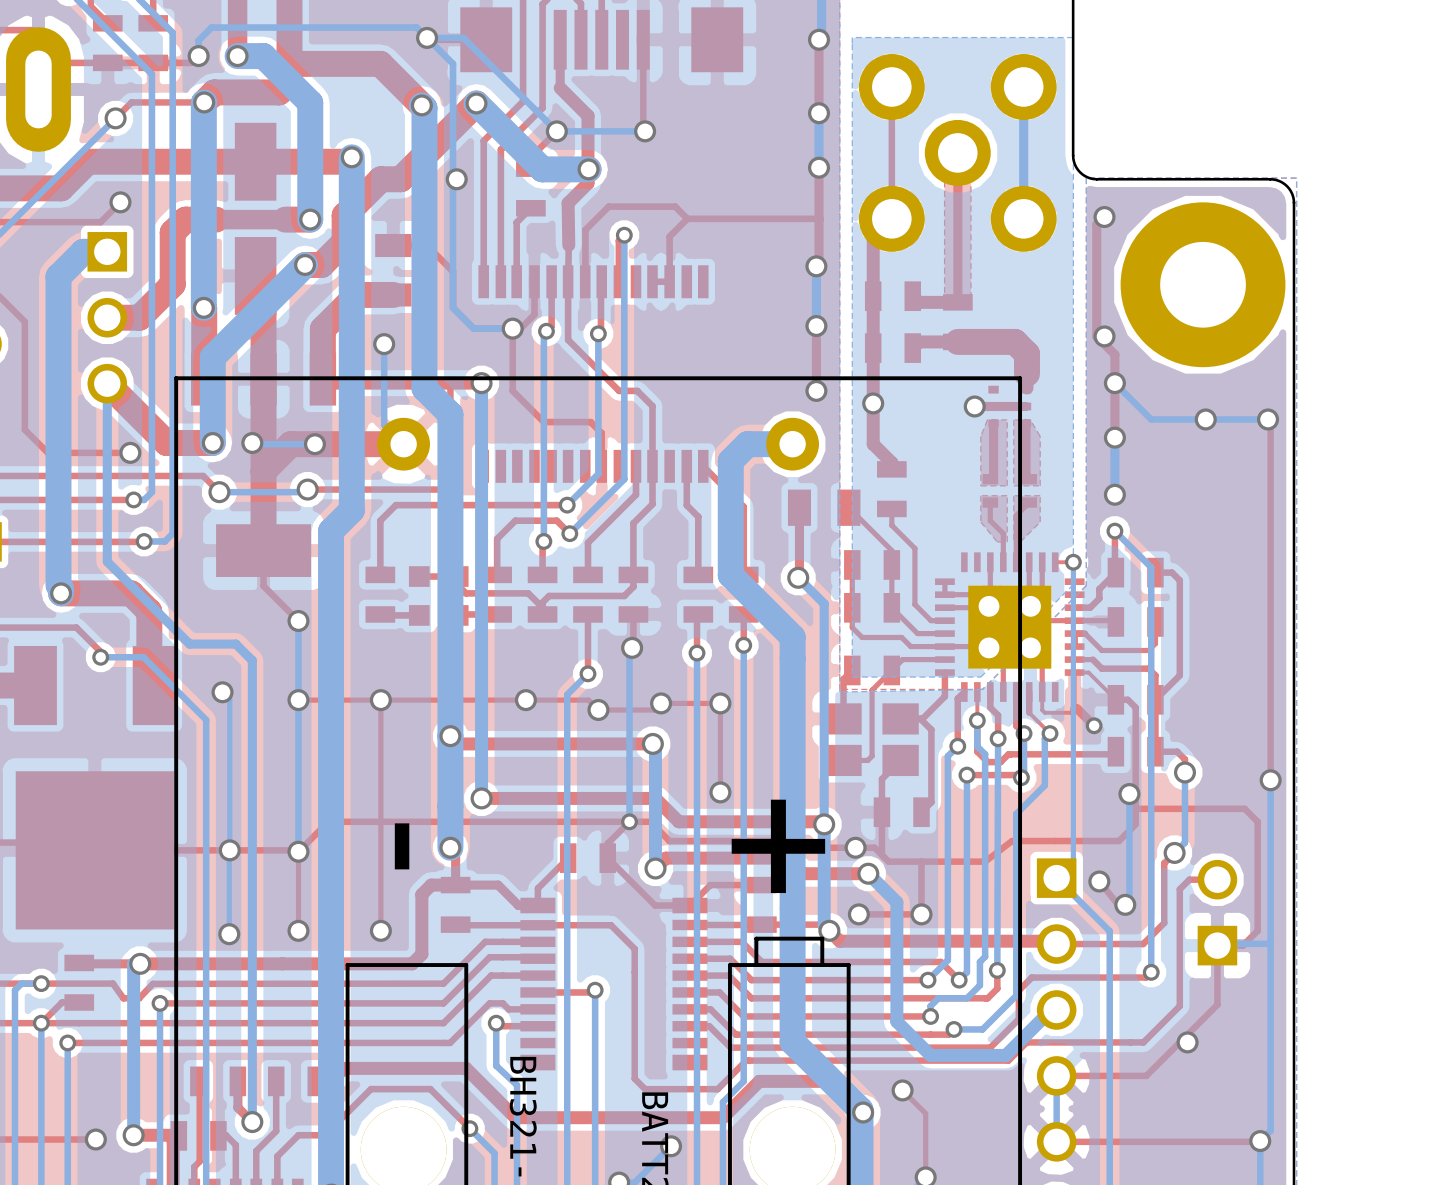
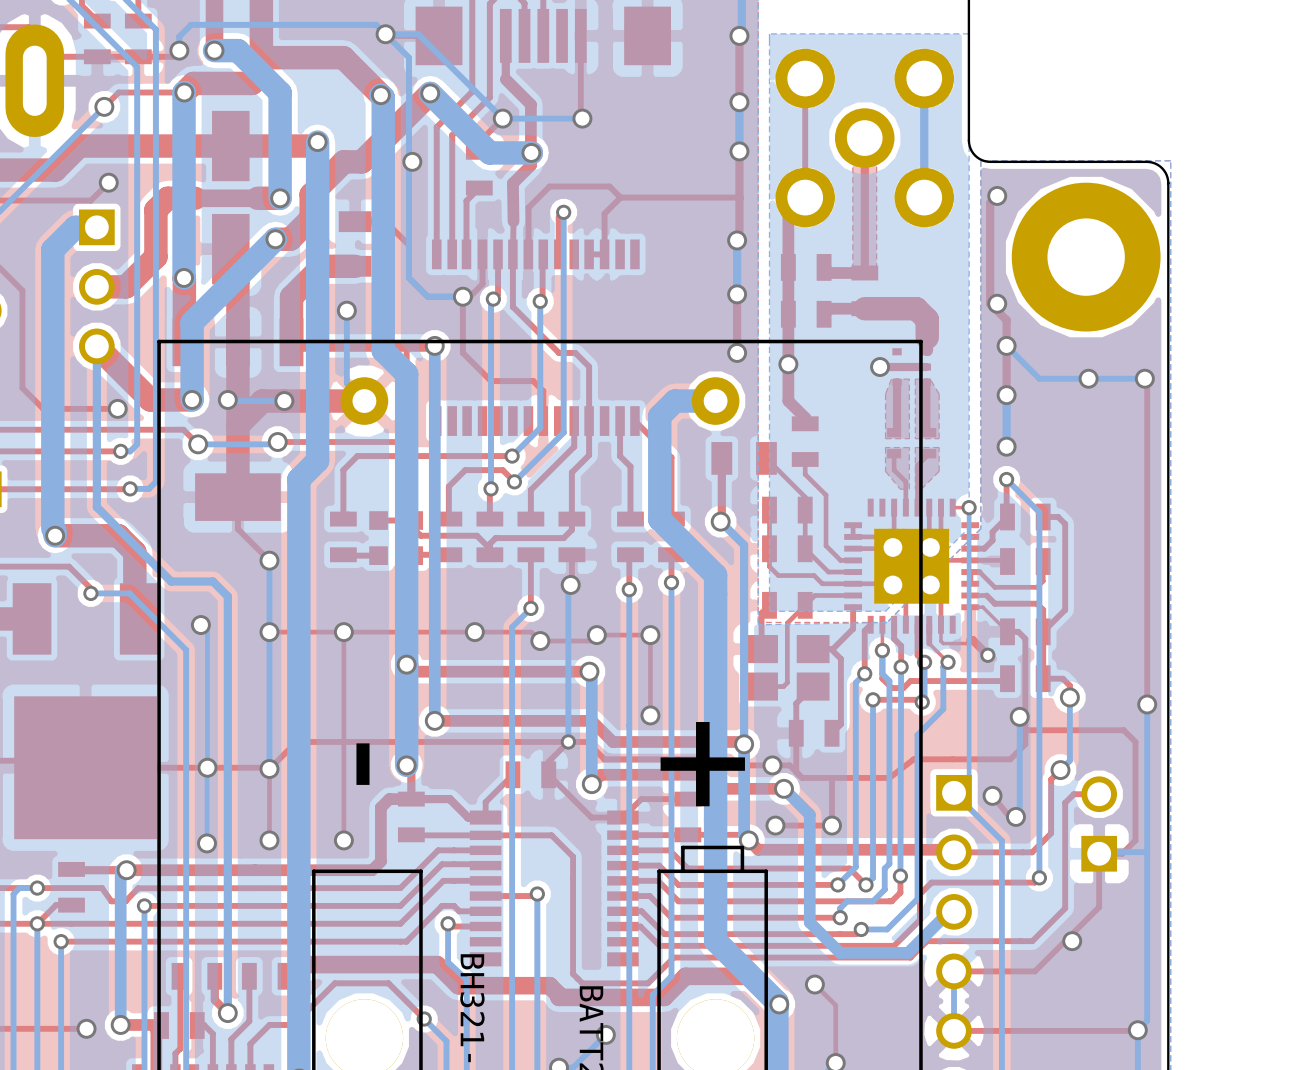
top track: (466, 1068) (515, 1117) (722, 1117) (735, 1104) -> (420, 964) (437, 964) (458, 985) (549, 985) (559, 997) (664, 997)
top track width: thin (466, 1068) (344, 1068) -> thick (420, 964) (310, 964)
top track width: thin (735, 1104) (759, 1081) (831, 1081) (863, 1112) -> thick (664, 997) (685, 976) (751, 976) (779, 1004)

